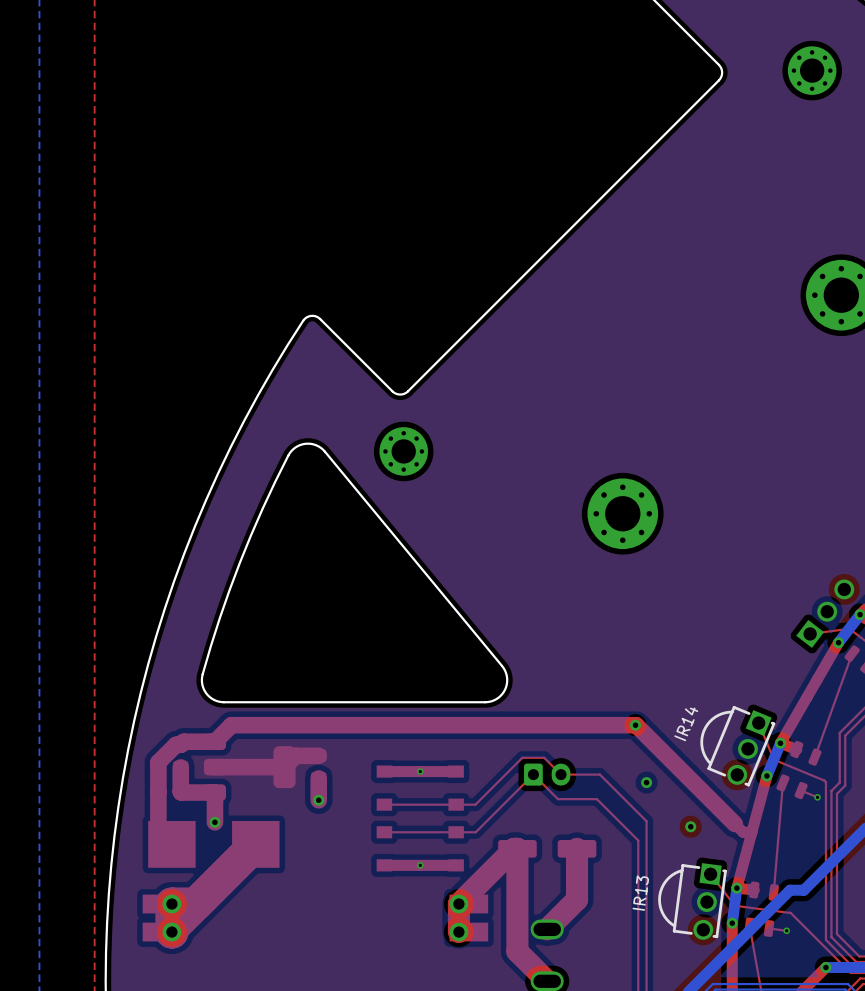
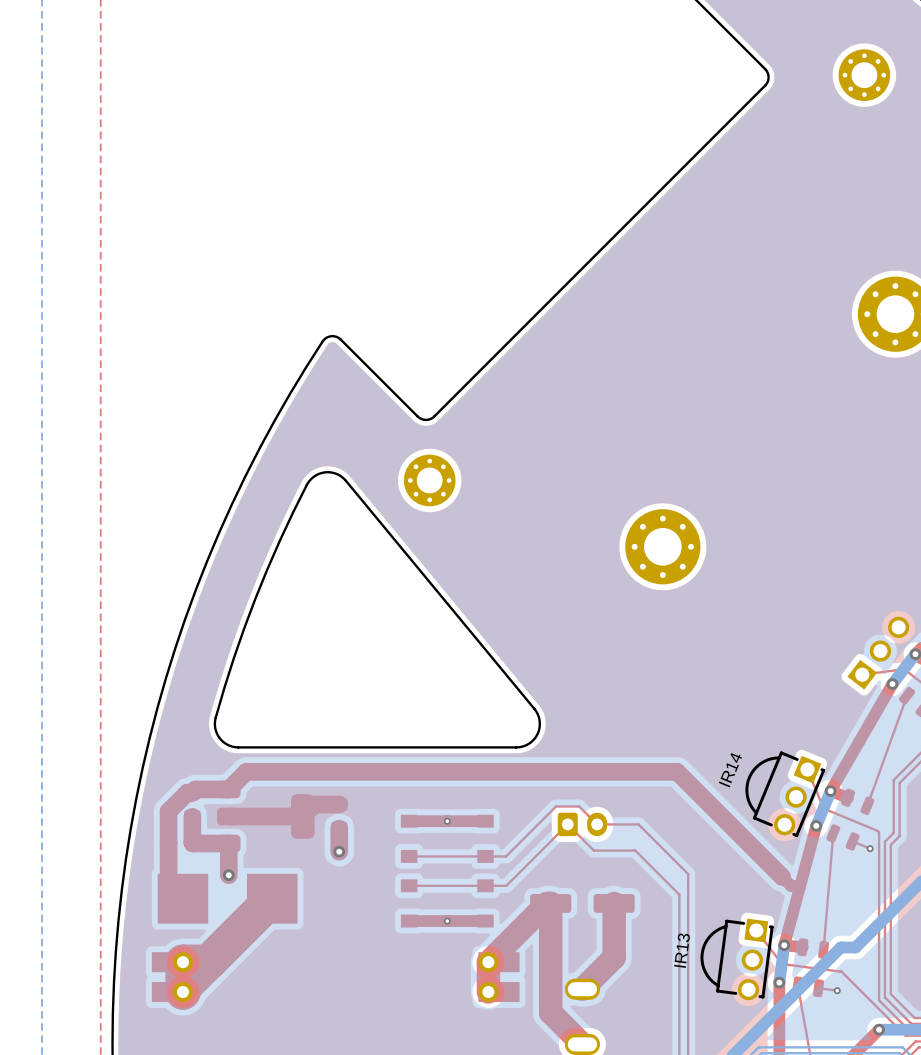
part: (635, 725) -> none
part: (646, 782) -> none
part: (690, 826) -> none

